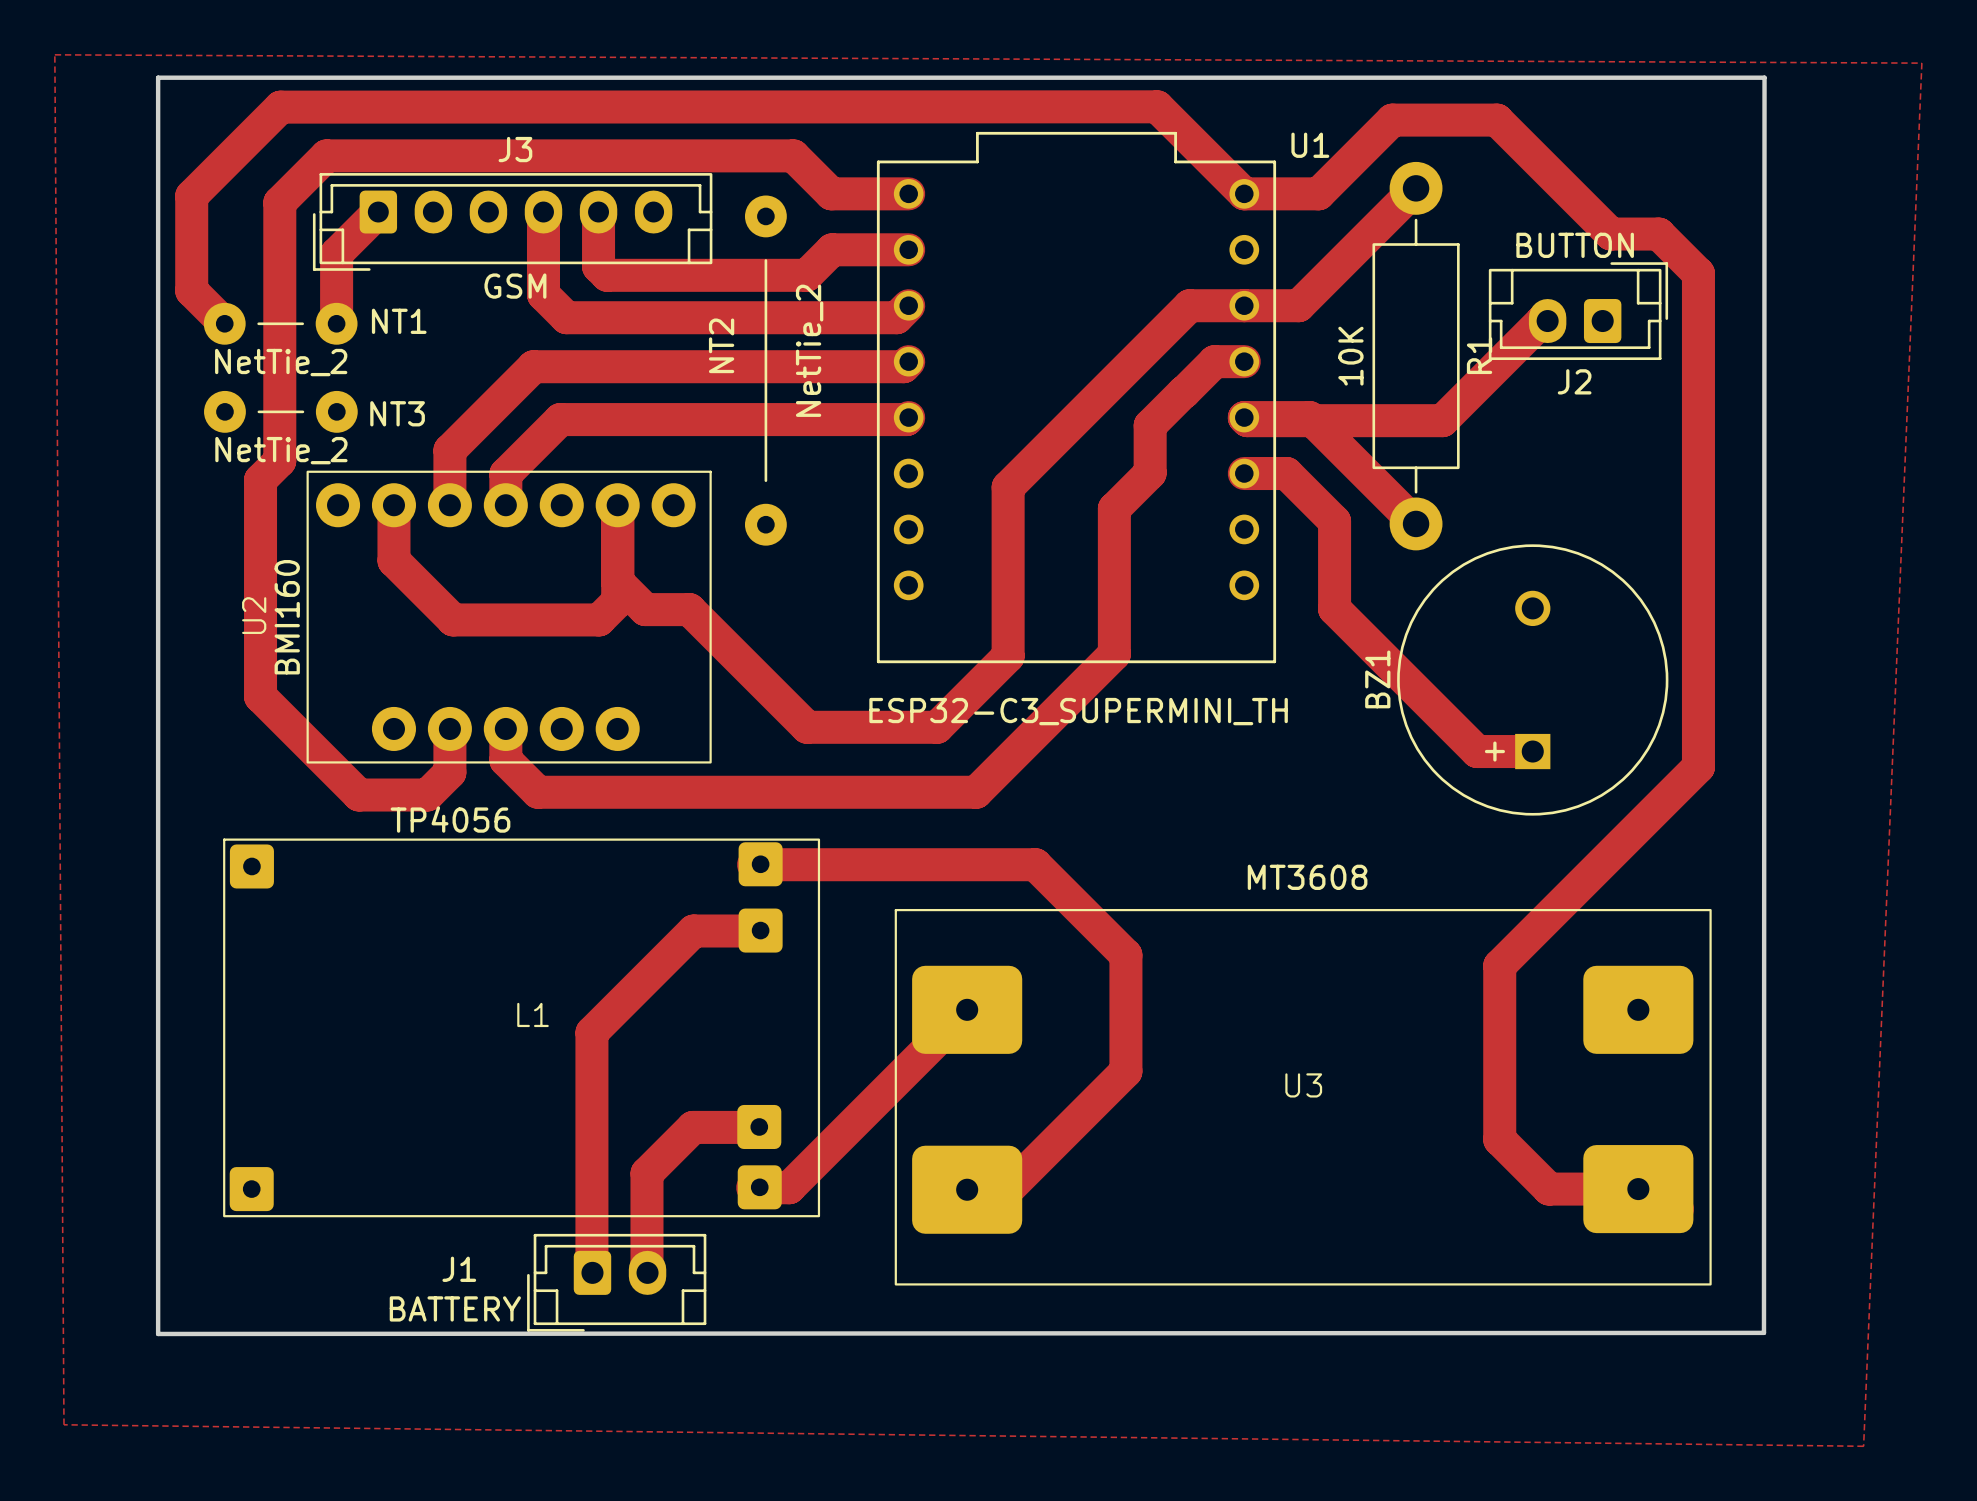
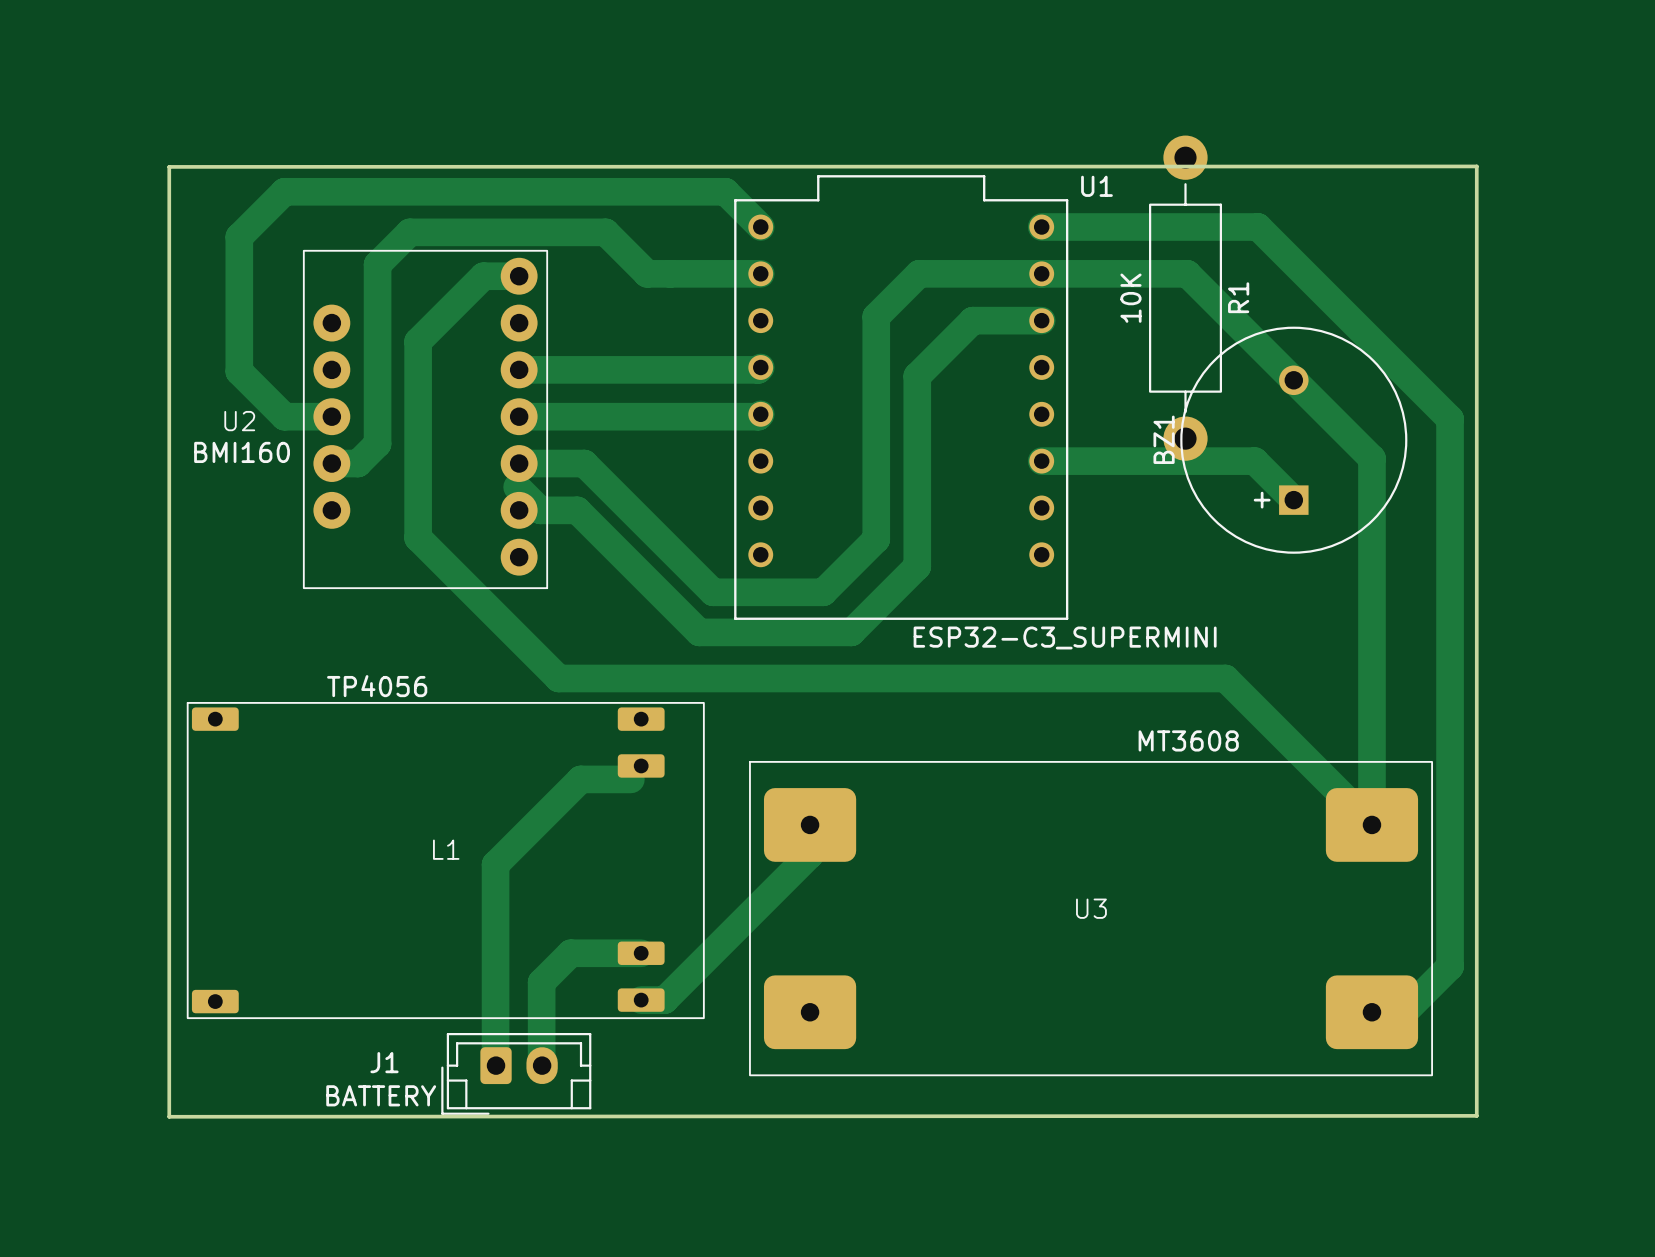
zone outline: (54, 54) (1921, 63) (1863, 1446) (63, 1424) (54, 54) -> none
track: (1416, 188) (1298, 305) (1189, 305) (1008, 487) (1008, 656) (937, 727) (807, 727) -> (1041, 320) (972, 320) (917, 376) (917, 566) (851, 632) (699, 632) (675, 608)
track: (908, 193) (831, 193) (793, 155) (326, 155) (279, 202) (279, 460) (260, 480) (260, 696) (359, 795) (427, 795) (449, 772) (449, 728) -> none
track: (378, 212) (336, 253) (336, 323) -> none
track: (543, 212) (543, 294) (566, 317) (896, 317) (908, 305) -> none
track: (598, 212) (598, 266) (607, 275) (806, 275) (832, 249) (908, 249) -> none
J3: GSM (512, 221) -> none
track: none -> (760, 227) (725, 191) (284, 191) (239, 236) (239, 371) (284, 416) (331, 416)
track: none -> (1041, 227) (1258, 227) (1450, 419) (1450, 966) (1404, 1012)
J2: BUTTON (1578, 311) -> none
track: (1547, 321) (1542, 321) (1442, 420) (1247, 420) (1244, 417) (1309, 417) (1416, 523) -> none
track: (224, 323) (191, 290) (191, 196) (280, 107) (1157, 106) (1244, 193) (1318, 193) (1392, 120) (1496, 120) (1610, 234) (1658, 234) (1698, 273) (1698, 766) (1499, 965) (1499, 1139) (1549, 1189) (1638, 1189) -> none
NT1: NetTie_2 (280, 323) -> none
track: none -> (760, 273) (647, 273) (605, 232) (409, 232) (377, 264) (377, 443) (357, 463) (331, 463)
track: none -> (519, 276) (483, 276) (418, 341) (418, 537) (558, 678) (1225, 678) (1371, 824) (1371, 458) (1187, 273) (919, 273) (876, 316) (876, 539) (823, 592) (713, 592) (584, 463) (519, 463)
track: (908, 361) (903, 366) (533, 366) (449, 450) (449, 505) -> none
track: (1244, 361) (1214, 361) (1150, 425) (1150, 472) (1114, 508) (1114, 654) (976, 792) (538, 792) (505, 760) (505, 728) -> none
NT2: NetTie_2 (765, 370) -> none
U1 position: (1076, 397) -> (901, 397)
NT3: NetTie_2 (280, 411) -> none
track: (908, 417) (906, 419) (560, 419) (505, 474) (505, 505) -> none
track: none -> (760, 367) (758, 369) (519, 369)
track: (1244, 473) (1286, 473) (1334, 521) (1334, 608) (1477, 751) (1532, 751) -> none
track: none -> (760, 414) (758, 416) (519, 416)
track: (393, 505) (393, 560) (453, 619) (599, 619) (617, 601) (617, 505) -> none
track: none -> (1041, 461) (1254, 461) (1293, 500)
U2 rotation: 0° (509, 617) -> 90° clockwise (425, 419)
BZ1 position: (1532, 679) -> (1293, 440)
U1 value: ESP32-C3_SUPERMINI_TH (1078, 711) -> ESP32-C3_SUPERMINI (1065, 637)
L1 footprint: [223, 838, 821, 1218] -> [186, 701, 705, 1020]
track: (753, 864) (1035, 864) (1125, 955) (1125, 1071) (1007, 1189) (967, 1189) -> none
U3 value position: MT3608 (1307, 877) -> MT3608 (1188, 740)
U3 footprint: [894, 908, 1712, 1286] -> [749, 760, 1433, 1077]
track: none -> (810, 824) (810, 854) (664, 1000) (641, 1000)
track: (967, 1009) (789, 1187) (752, 1187) -> none
track: (752, 1127) (693, 1127) (681, 1138) -> (641, 953) (570, 953)
board edge: (1763, 1332) (1764, 77) (158, 77) (158, 1333) (202, 1333) -> (1476, 1115) (1476, 166) (169, 166) (169, 1116)

